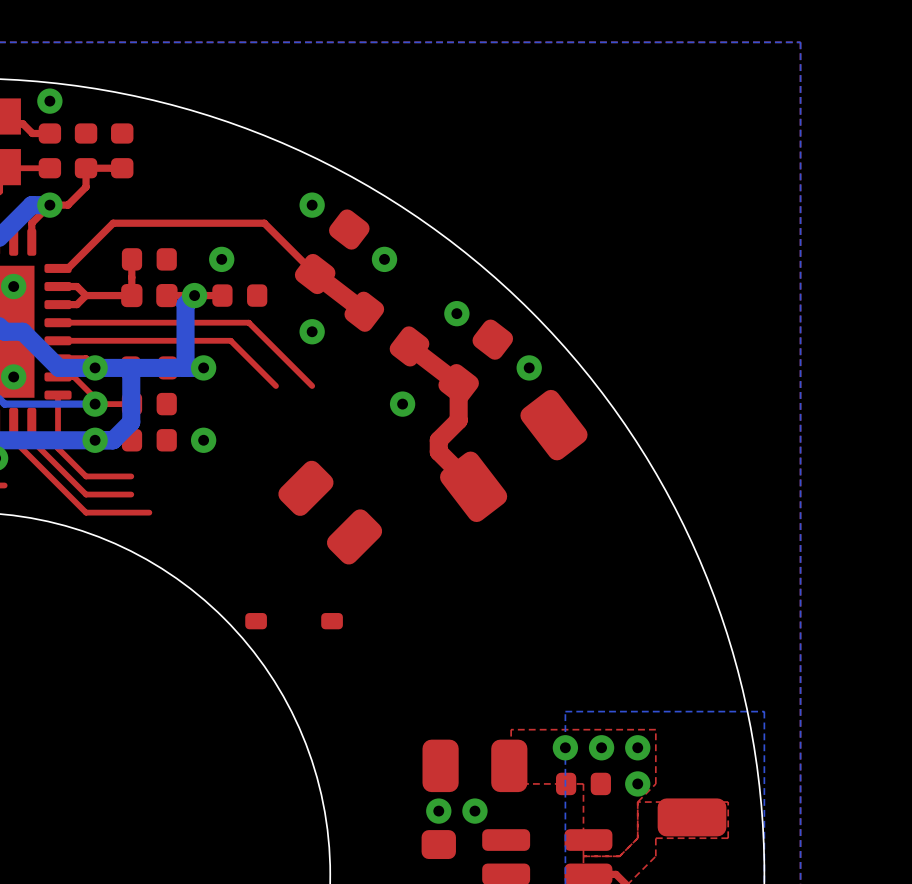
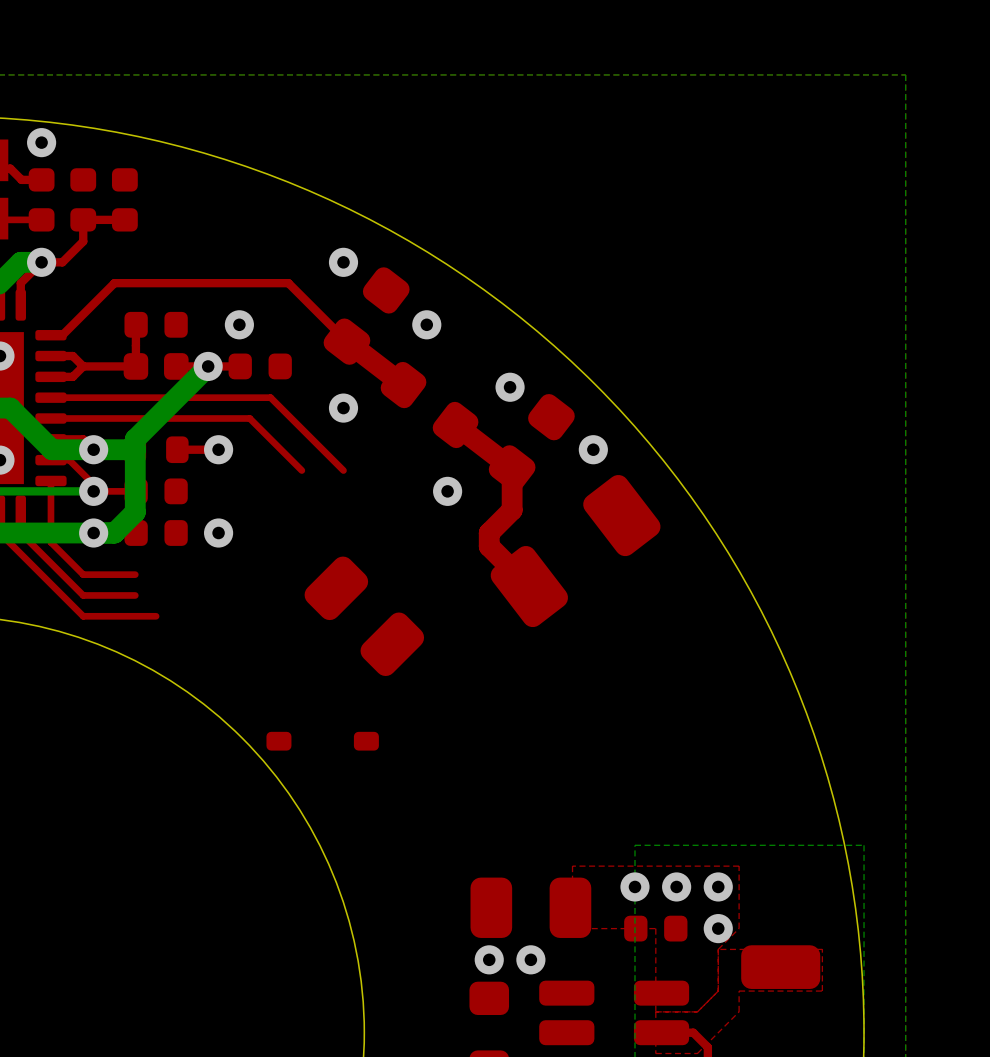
bottom track: (185, 304) (185, 367) -> (197, 376) (135, 439) (135, 449)
bottom track: (203, 367) (131, 367) -> none

